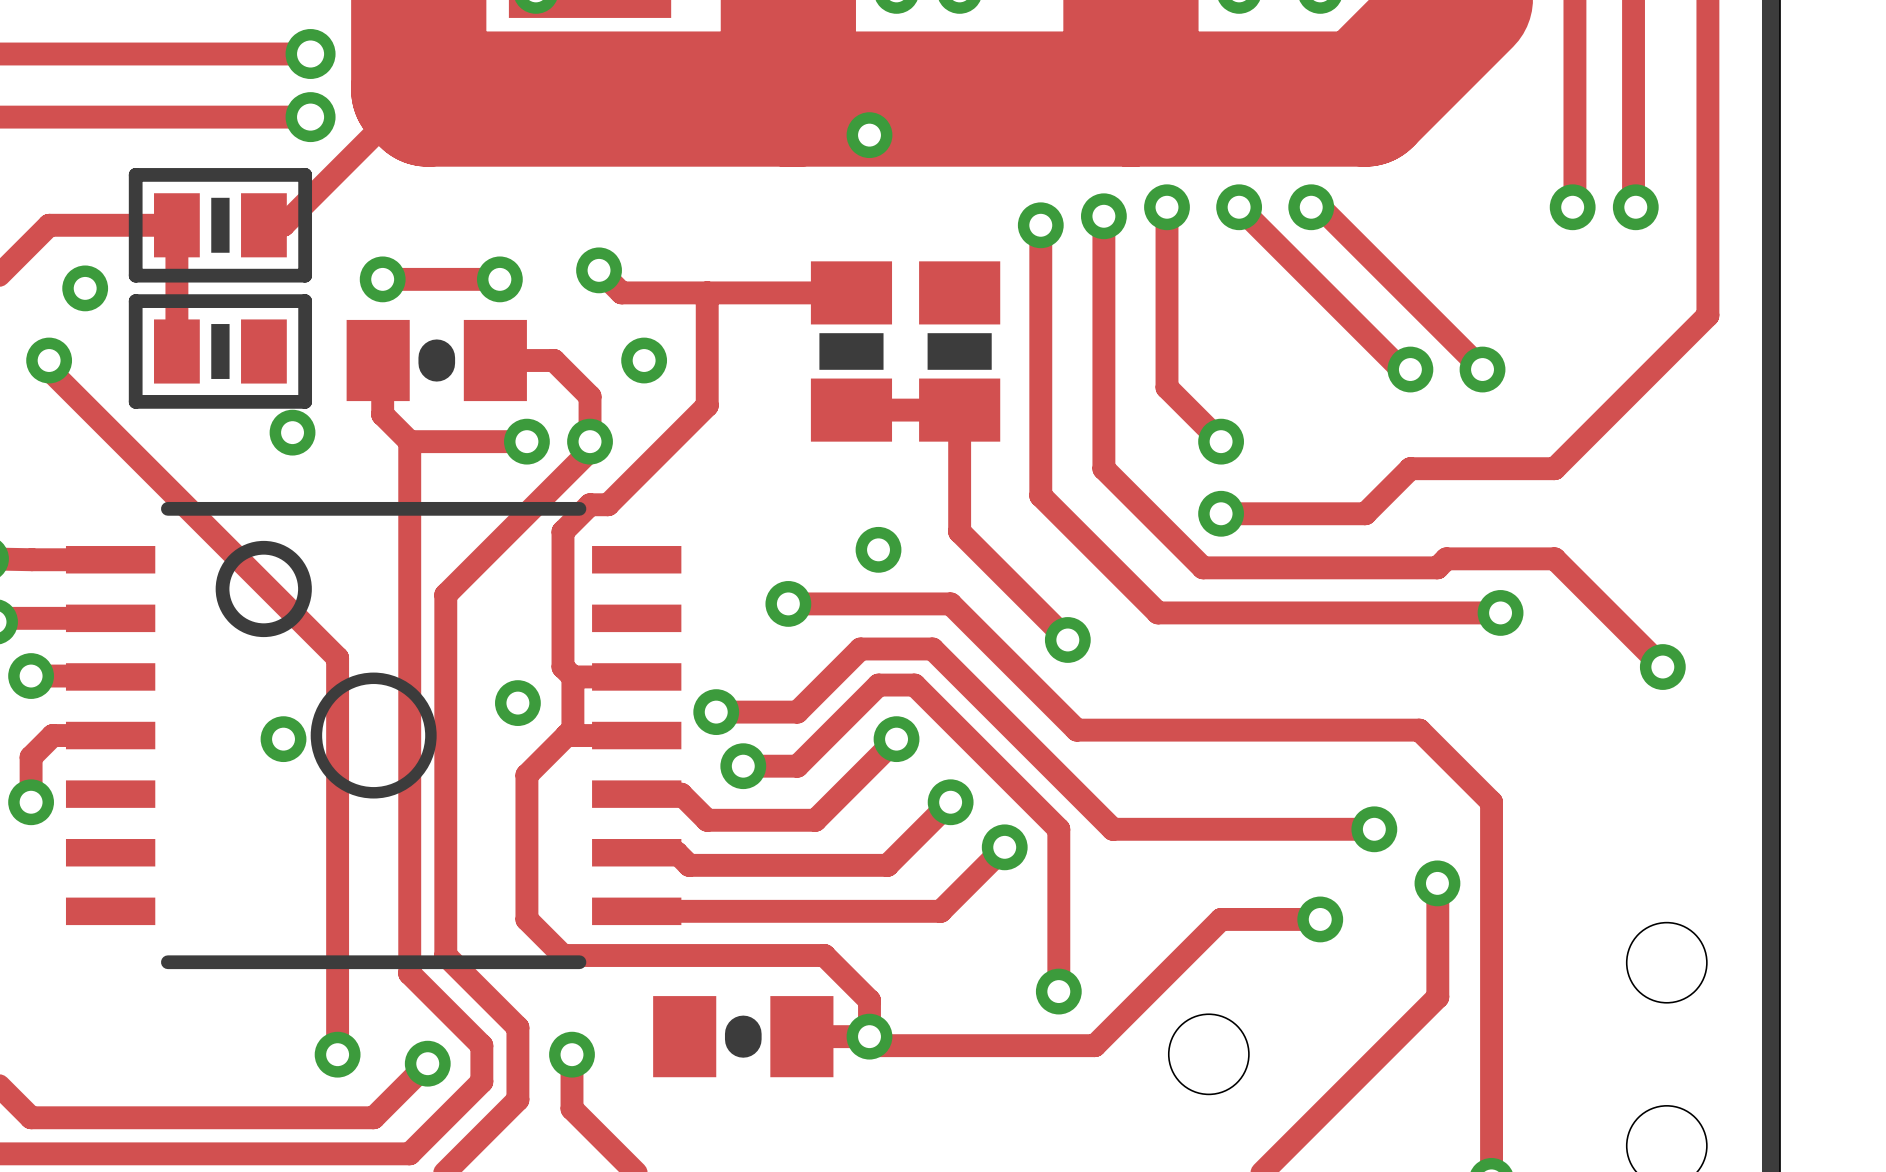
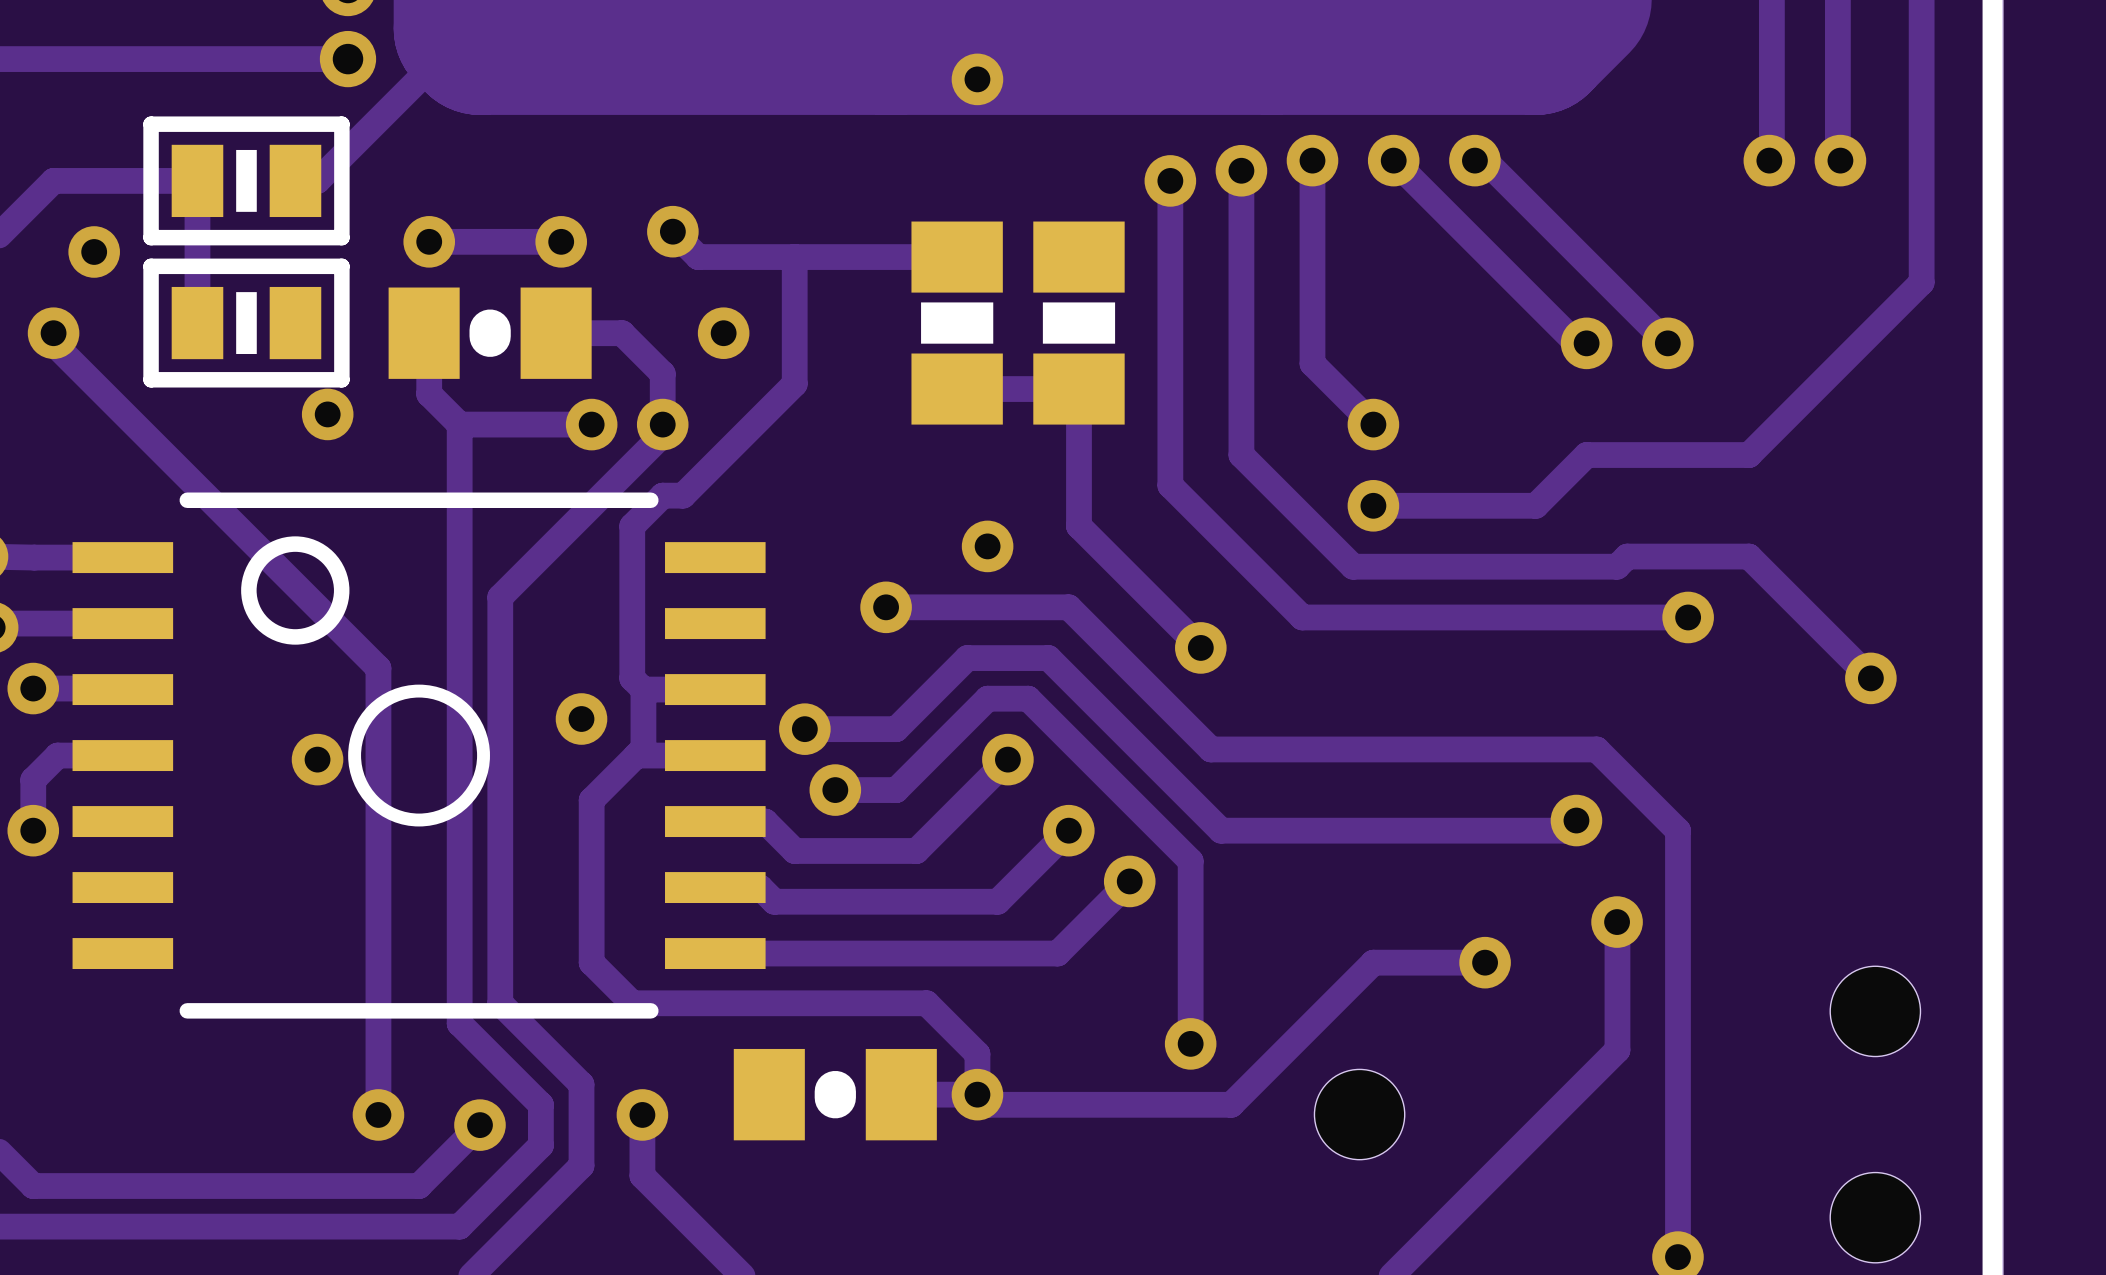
track: (1085, 802) (1112, 829) (1374, 829) -> (1221, 830) (1566, 830) (1576, 820)
via position: (1374, 829) -> (1576, 820)

